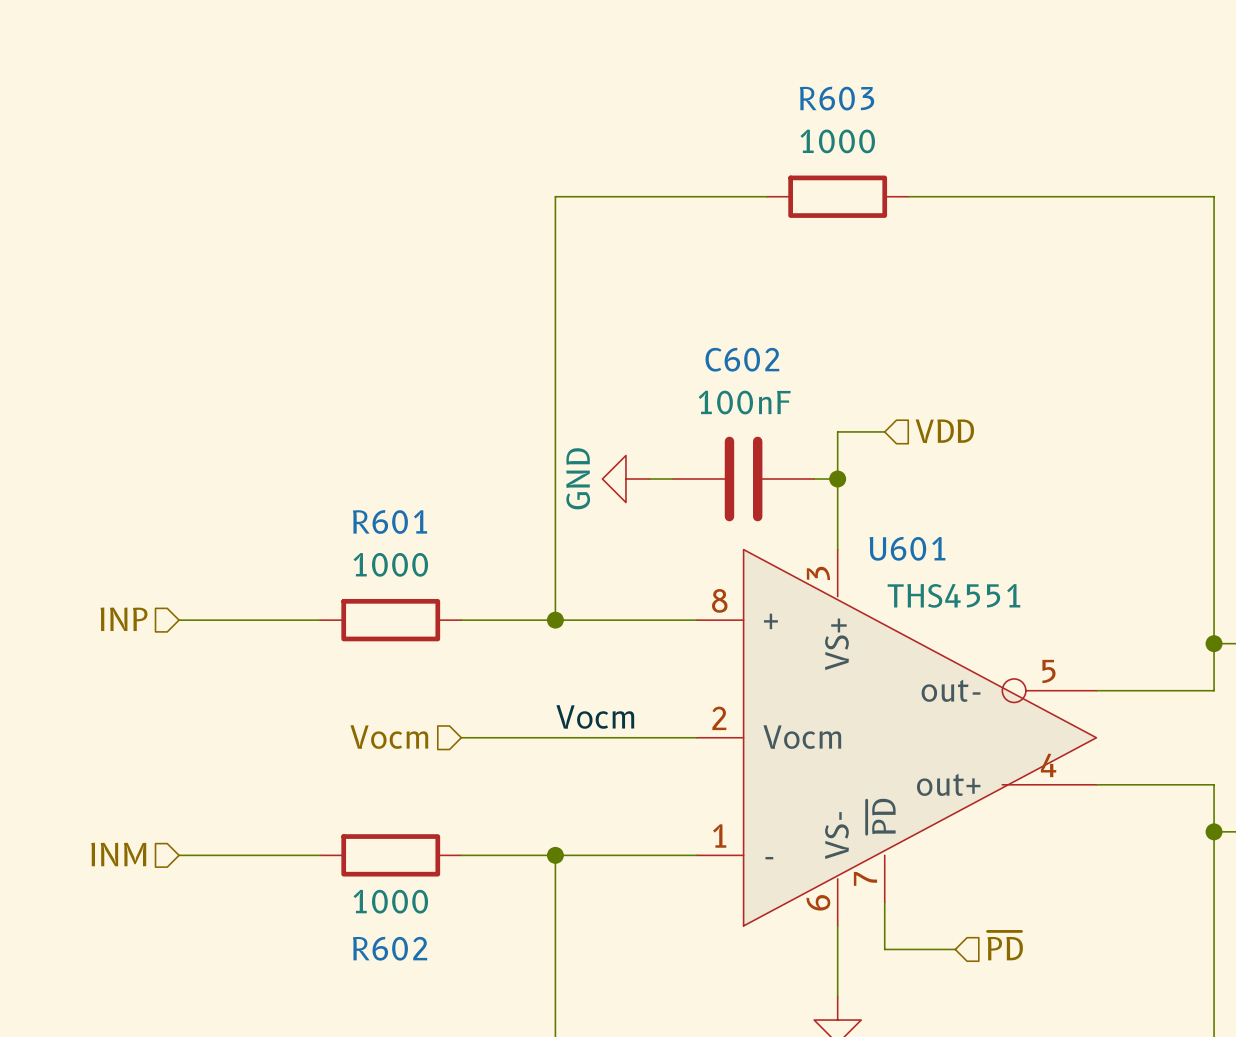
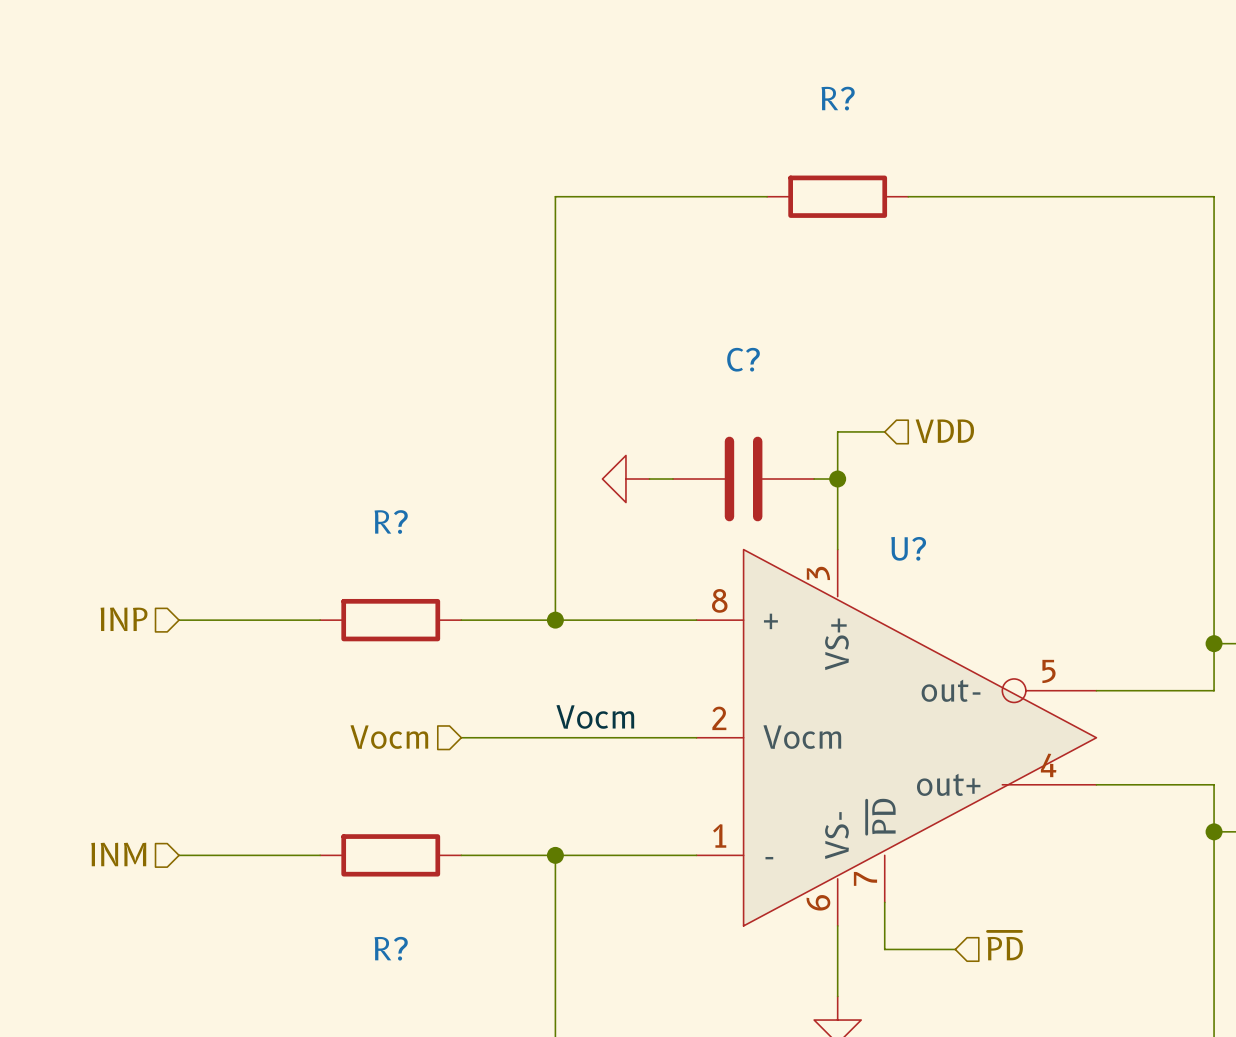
R603 name: R603 (837, 98) -> R? (838, 98)
R603 value: 1000 (837, 141) -> none
C602 name: C602 (742, 359) -> C? (743, 359)
C602 value: 100nF (744, 402) -> none
power symbol text: GND (578, 478) -> none
R601 name: R601 (390, 522) -> R? (391, 522)
U601 name: U601 (907, 548) -> U? (908, 548)
R601 value: 1000 (390, 564) -> none
U601 value: THS4551 (953, 595) -> none
R602 value: 1000 (390, 901) -> none
R602 name: R602 (390, 948) -> R? (391, 948)

